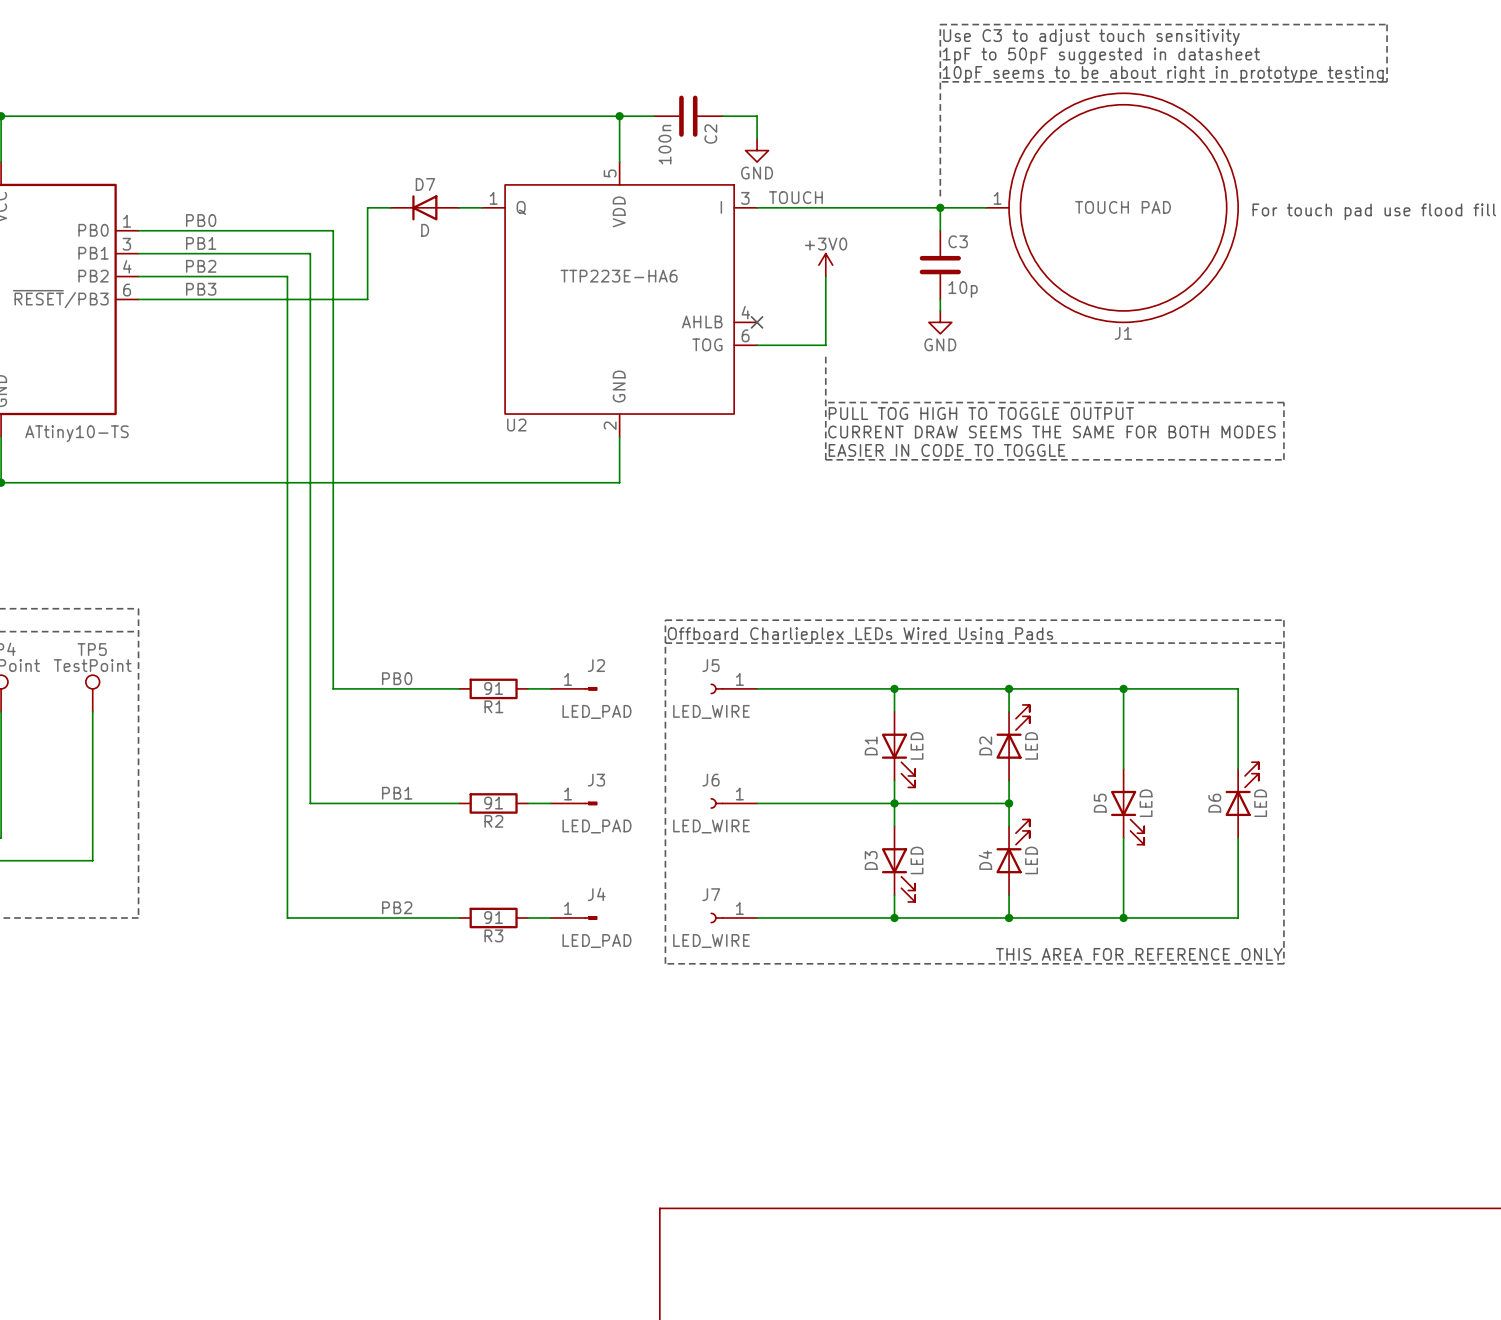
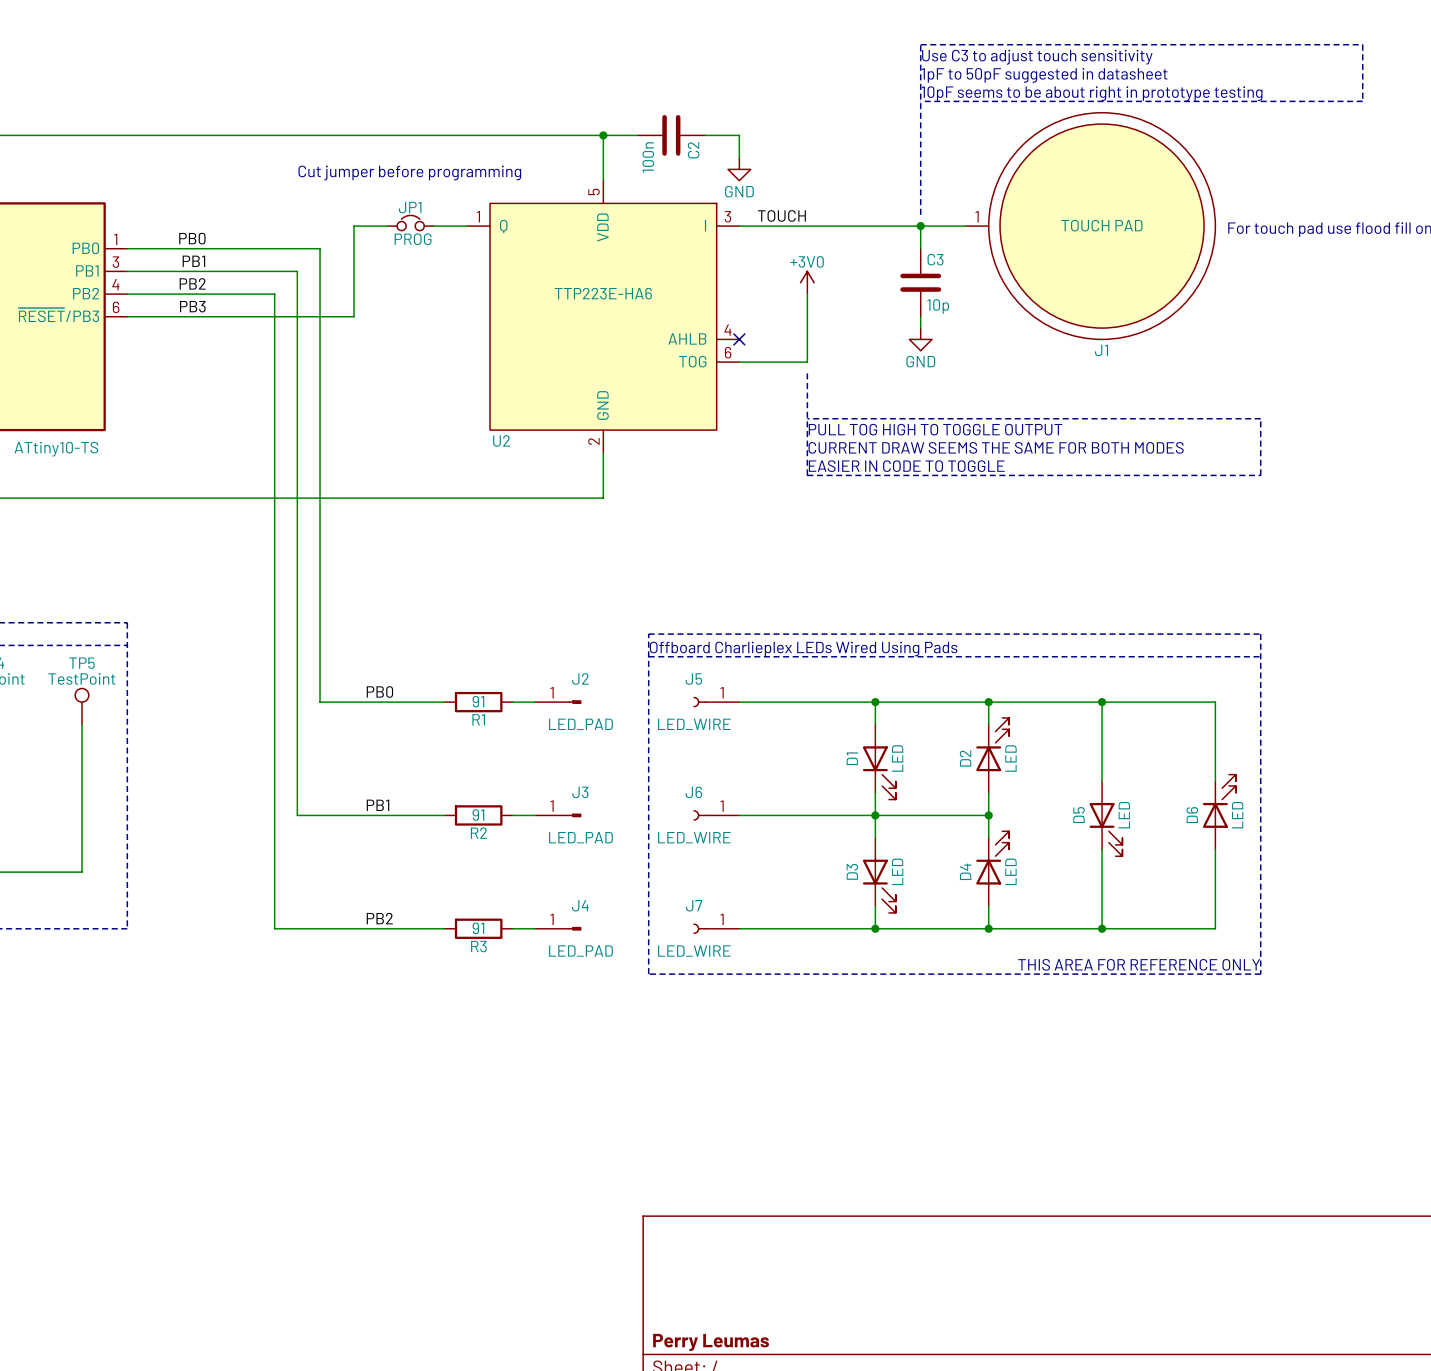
text: none -> Cut jumper before programming (409, 173)
JP1: none -> PROG (410, 223)
D7: D (424, 207) -> none

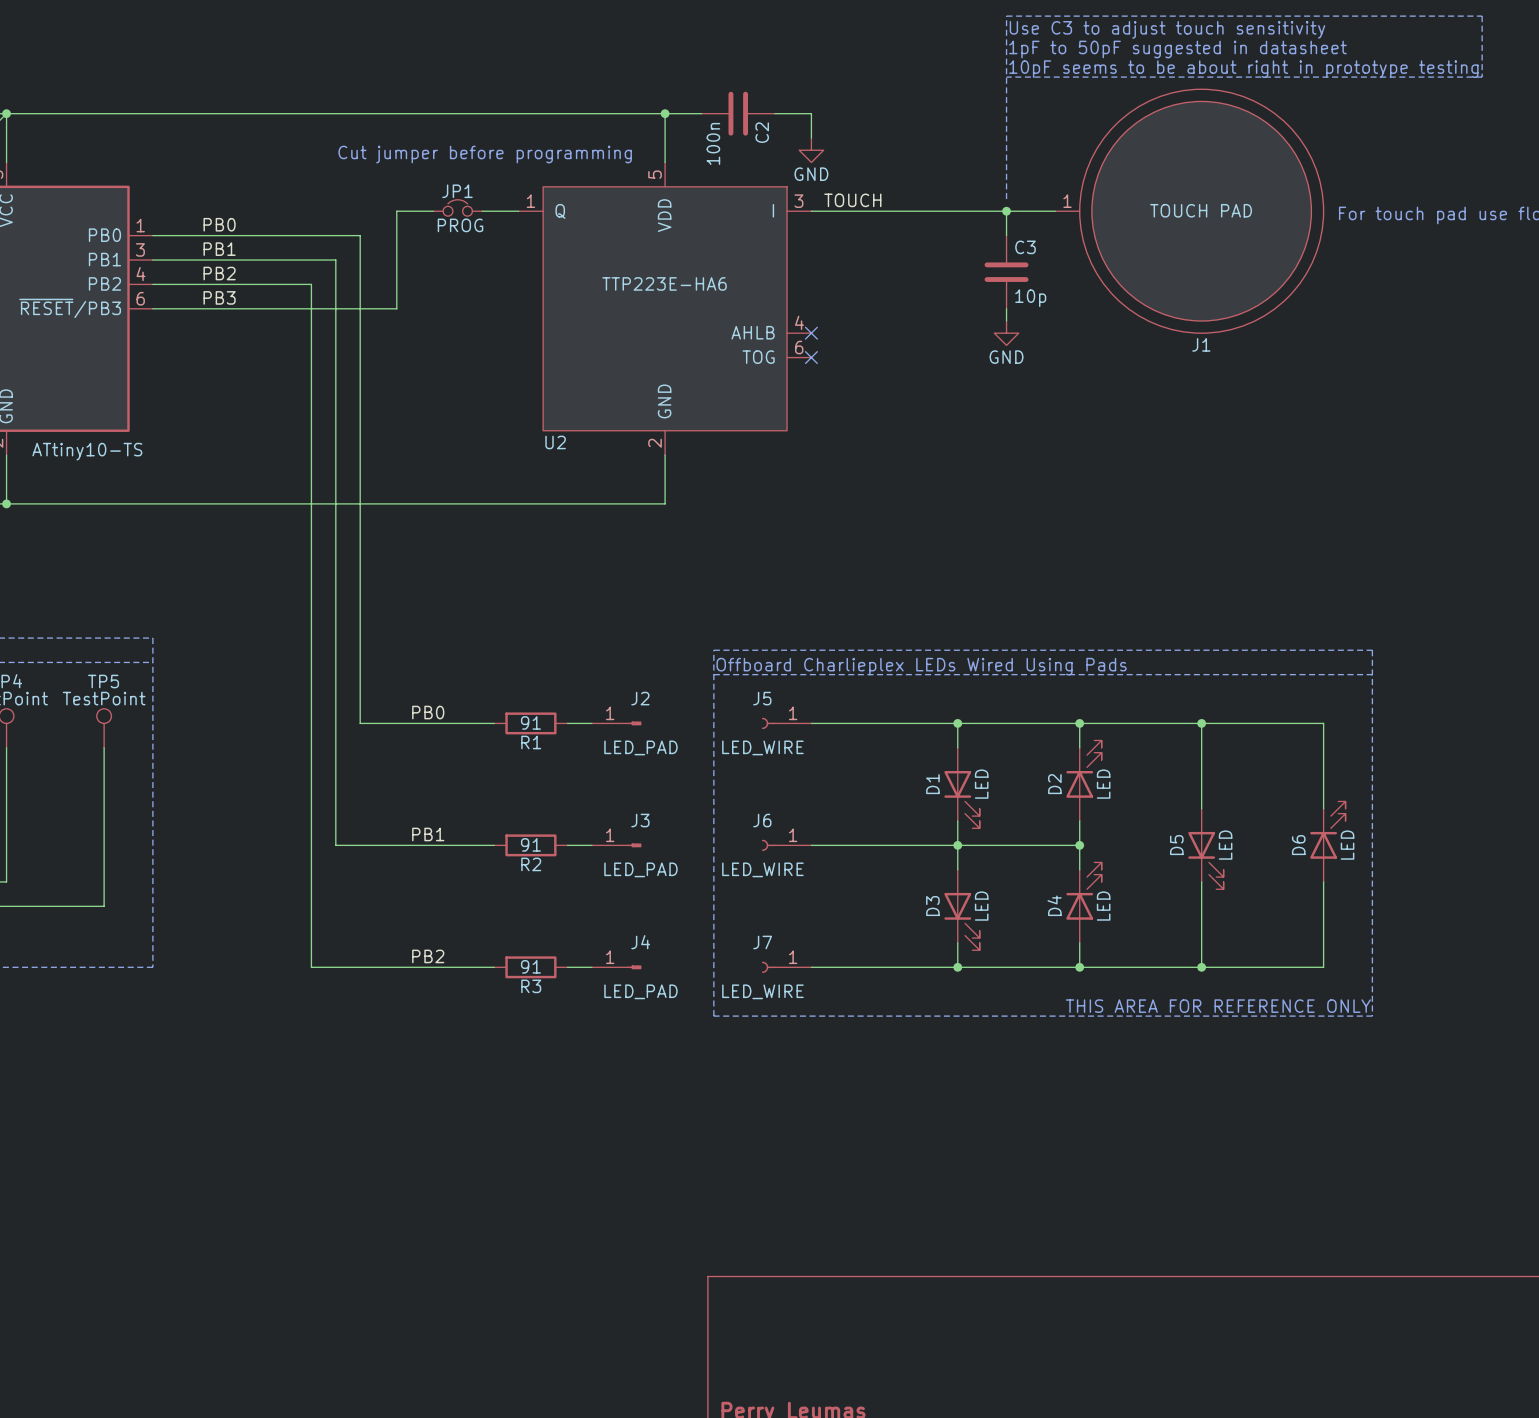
power symbol: +3V0 (807, 282) -> none
wire: (807, 294) (807, 362) (739, 362) -> none
no-connect mark: none -> (811, 357)
line: (807, 373) (807, 475) (1260, 475) (1260, 418) (807, 418) -> none
text: PULL TOG HIGH TO TOGGLE OUTPUT (935, 429) -> none
text: CURRENT DRAW SEEMS THE SAME FOR BOTH MODES (996, 447) -> none
text: EASIER IN CODE TO TOGGLE (906, 466) -> none

